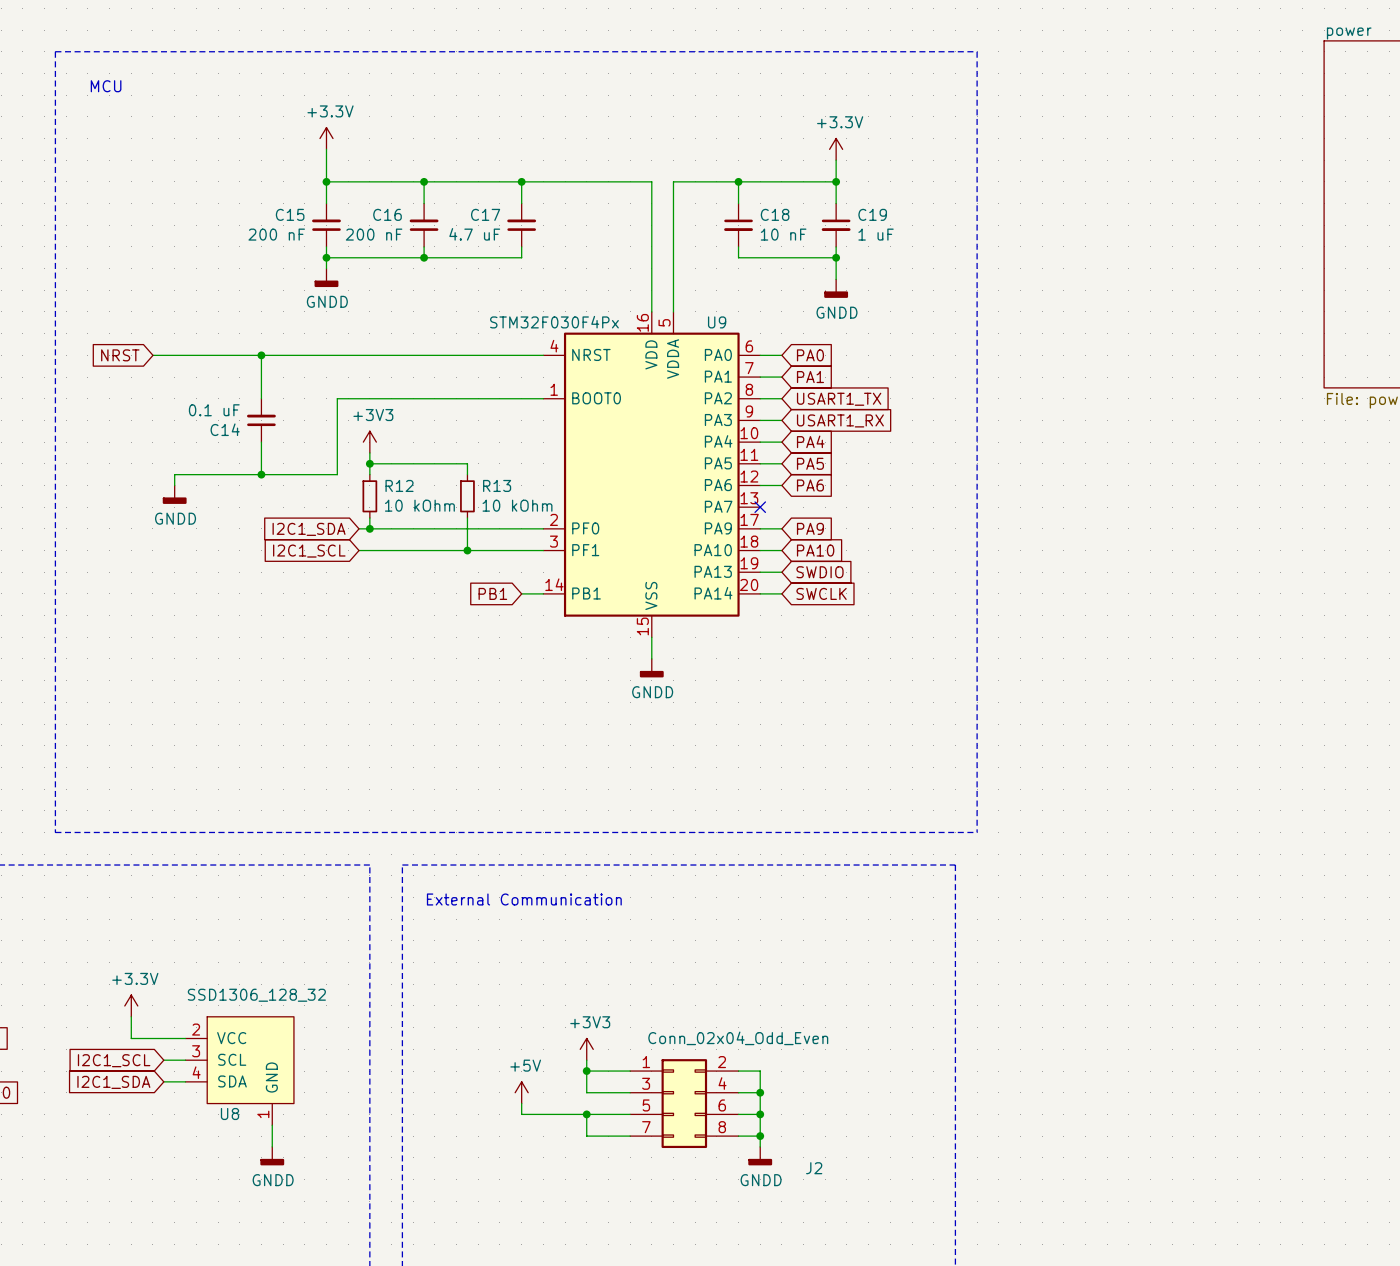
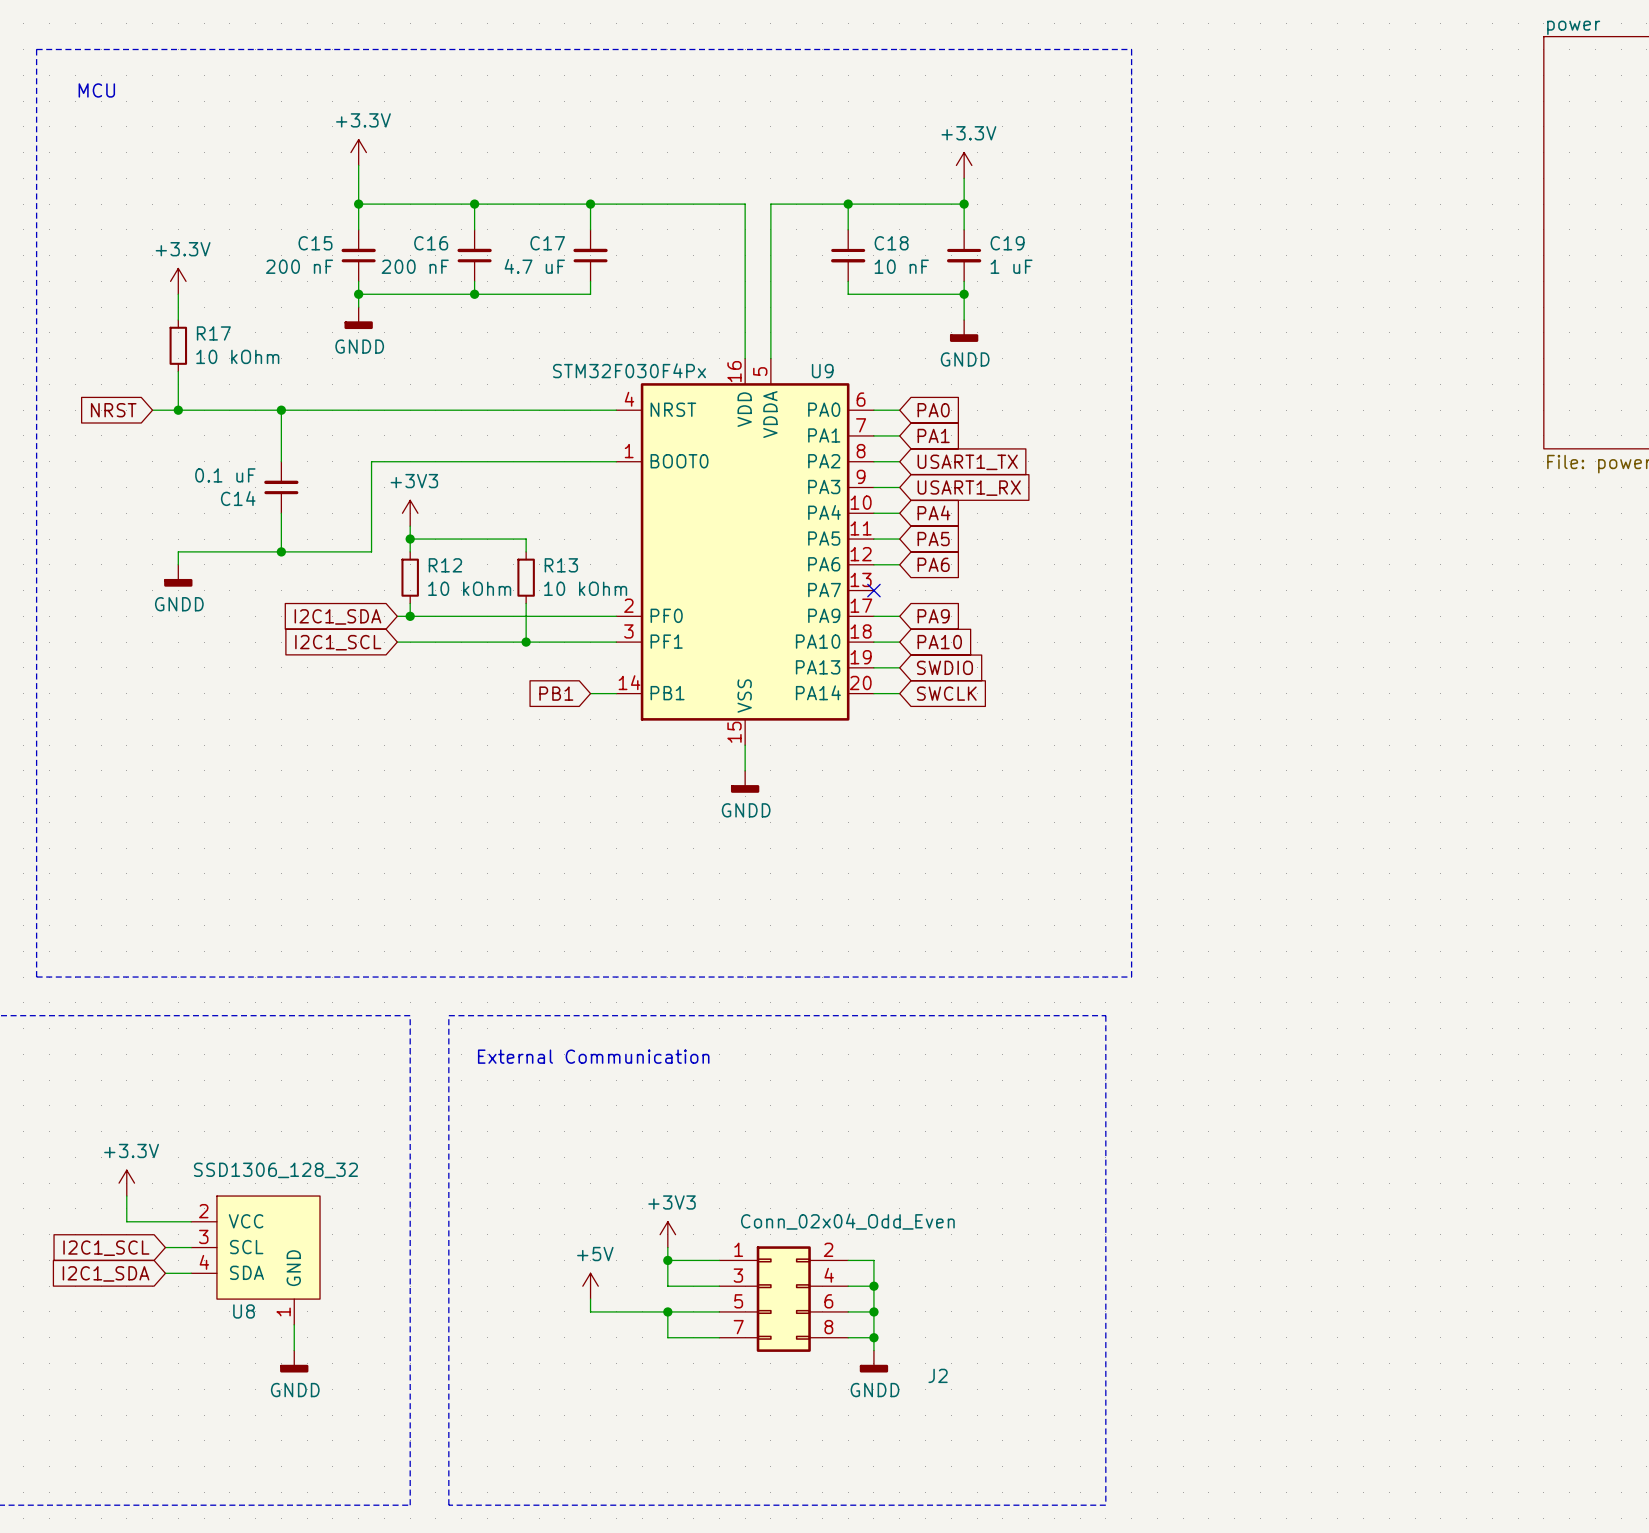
power symbol: none -> +3.3V (178, 281)
wire: none -> (178, 294) (178, 320)
R17: none -> 10 kOhm (178, 345)
wire: none -> (178, 371) (178, 410)
junction: none -> (178, 410)

